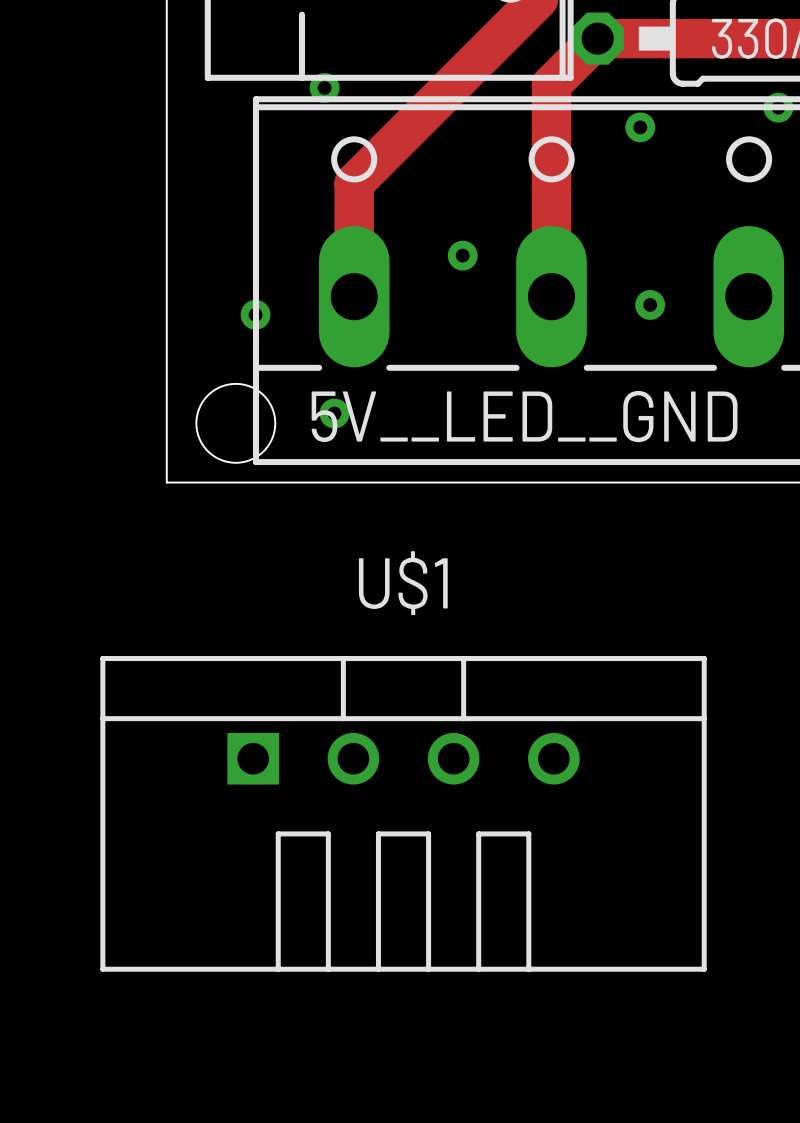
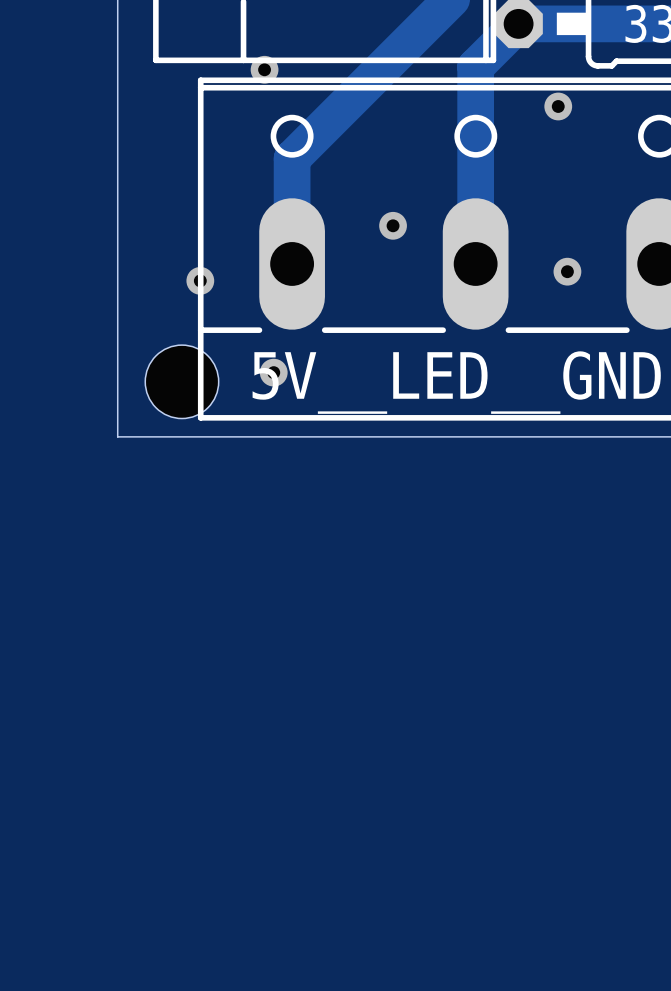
U$1: (403, 813) -> none

